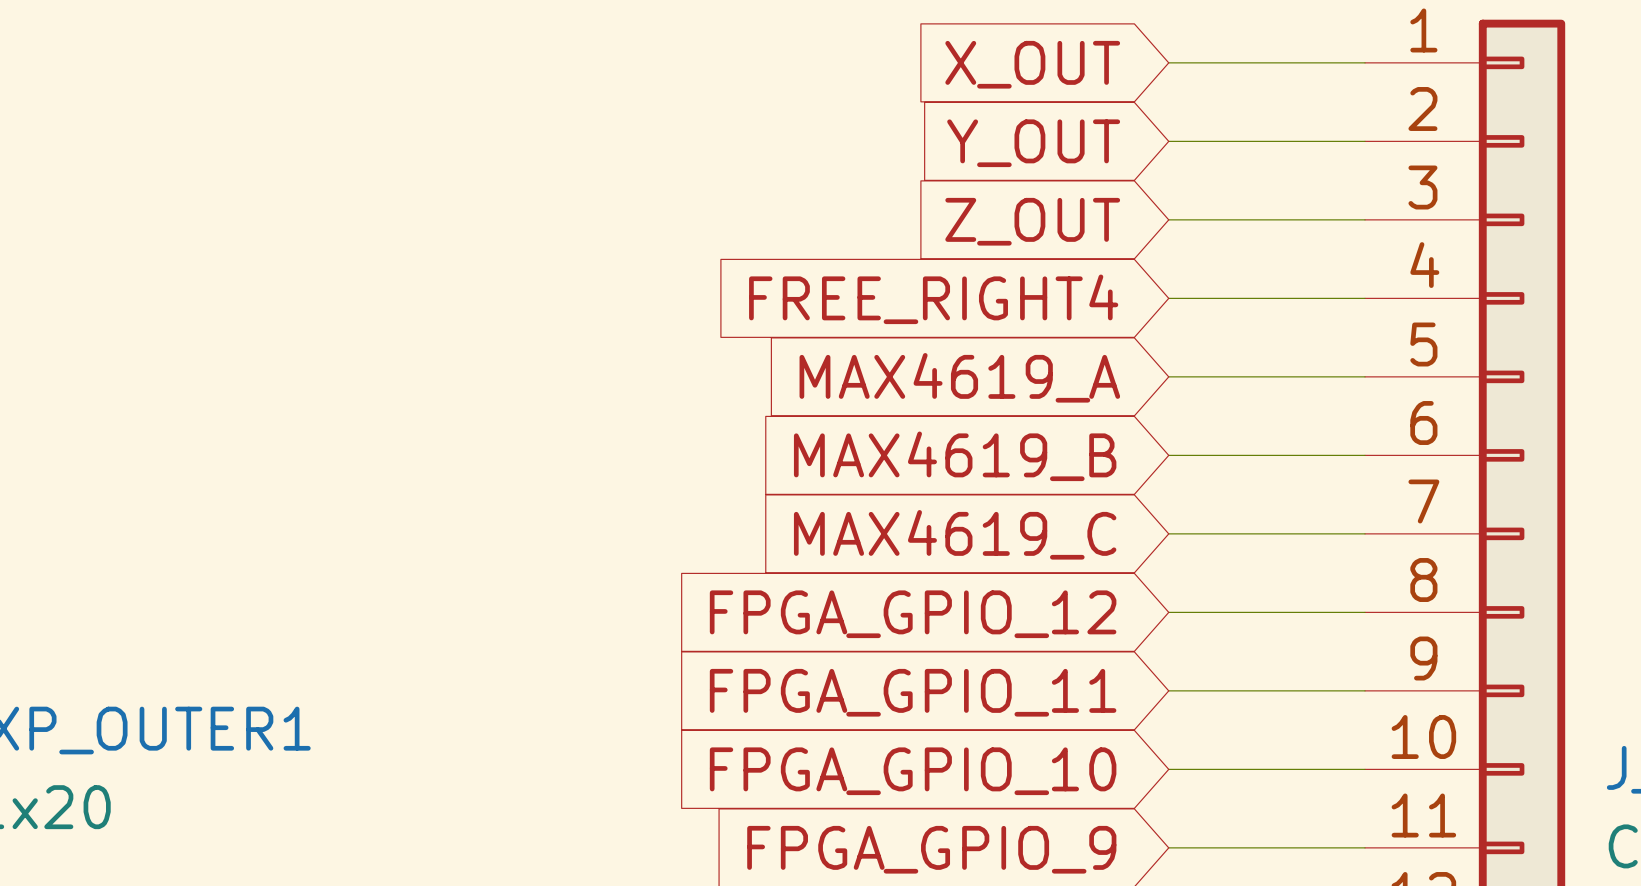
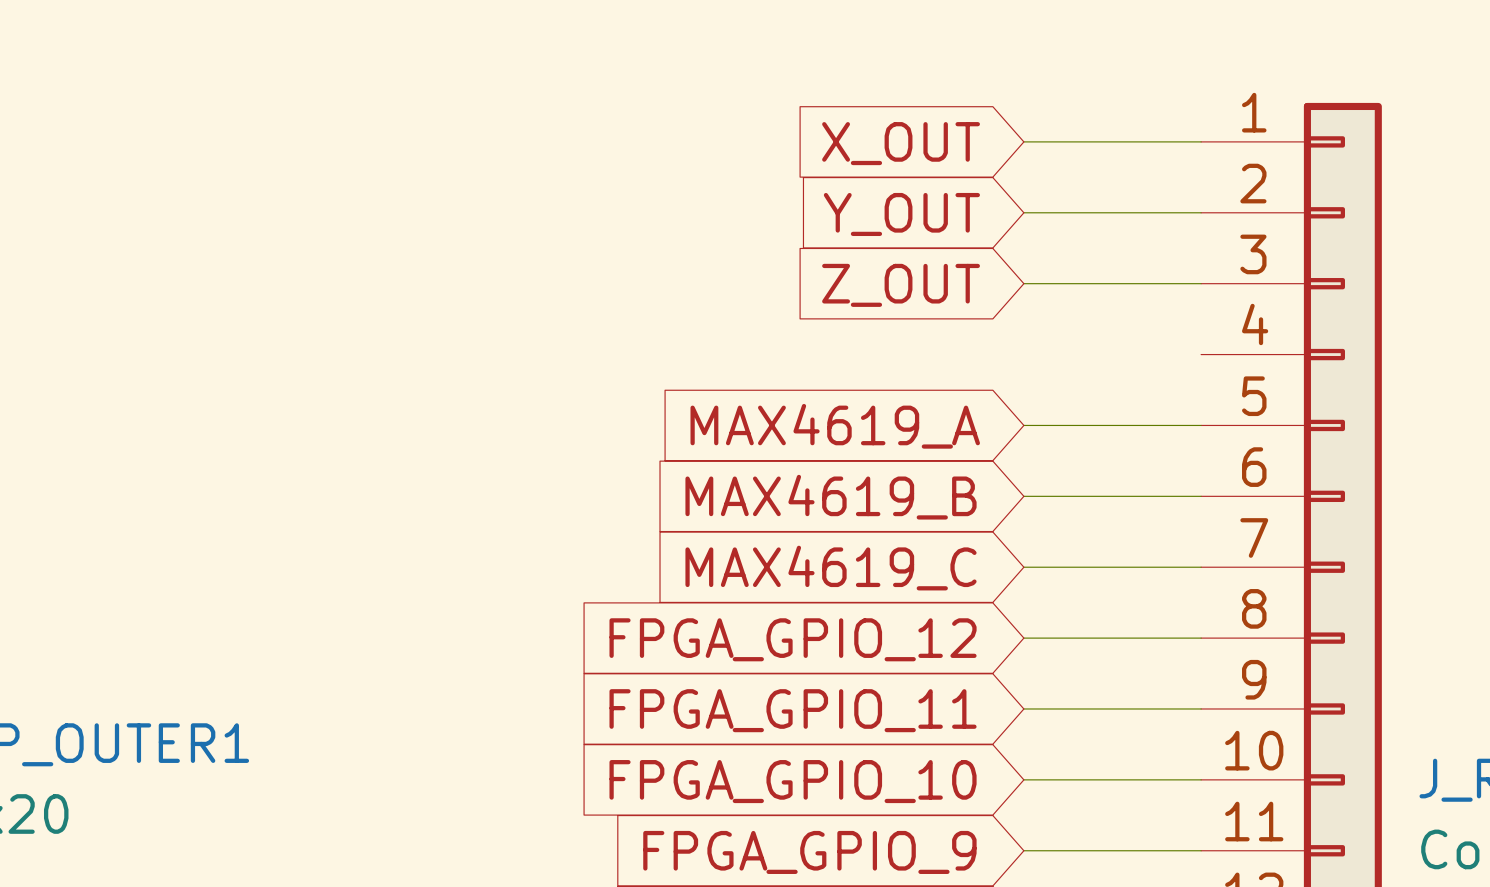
wire: (1168, 298) (1365, 298) -> none
global label: FREE_RIGHT4 (933, 299) -> none

